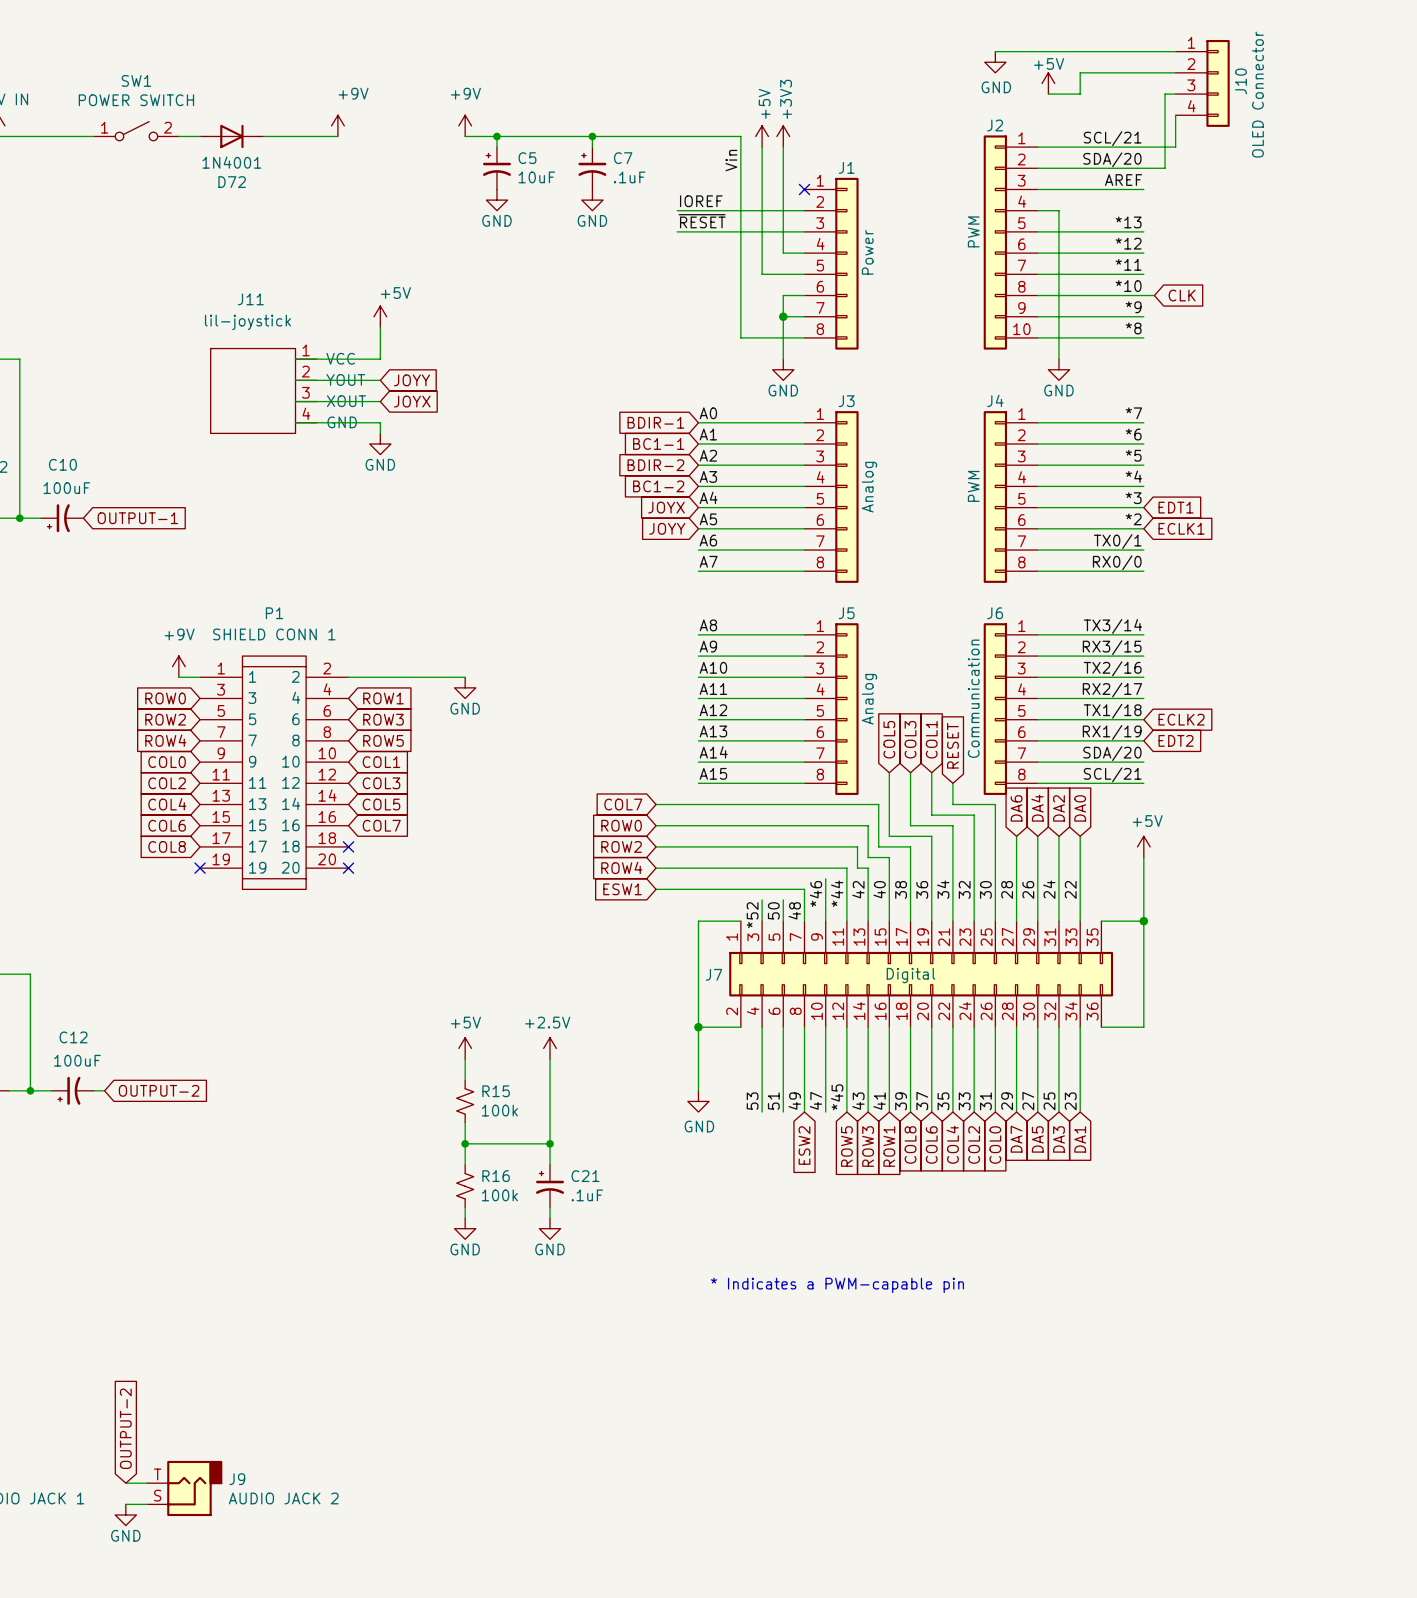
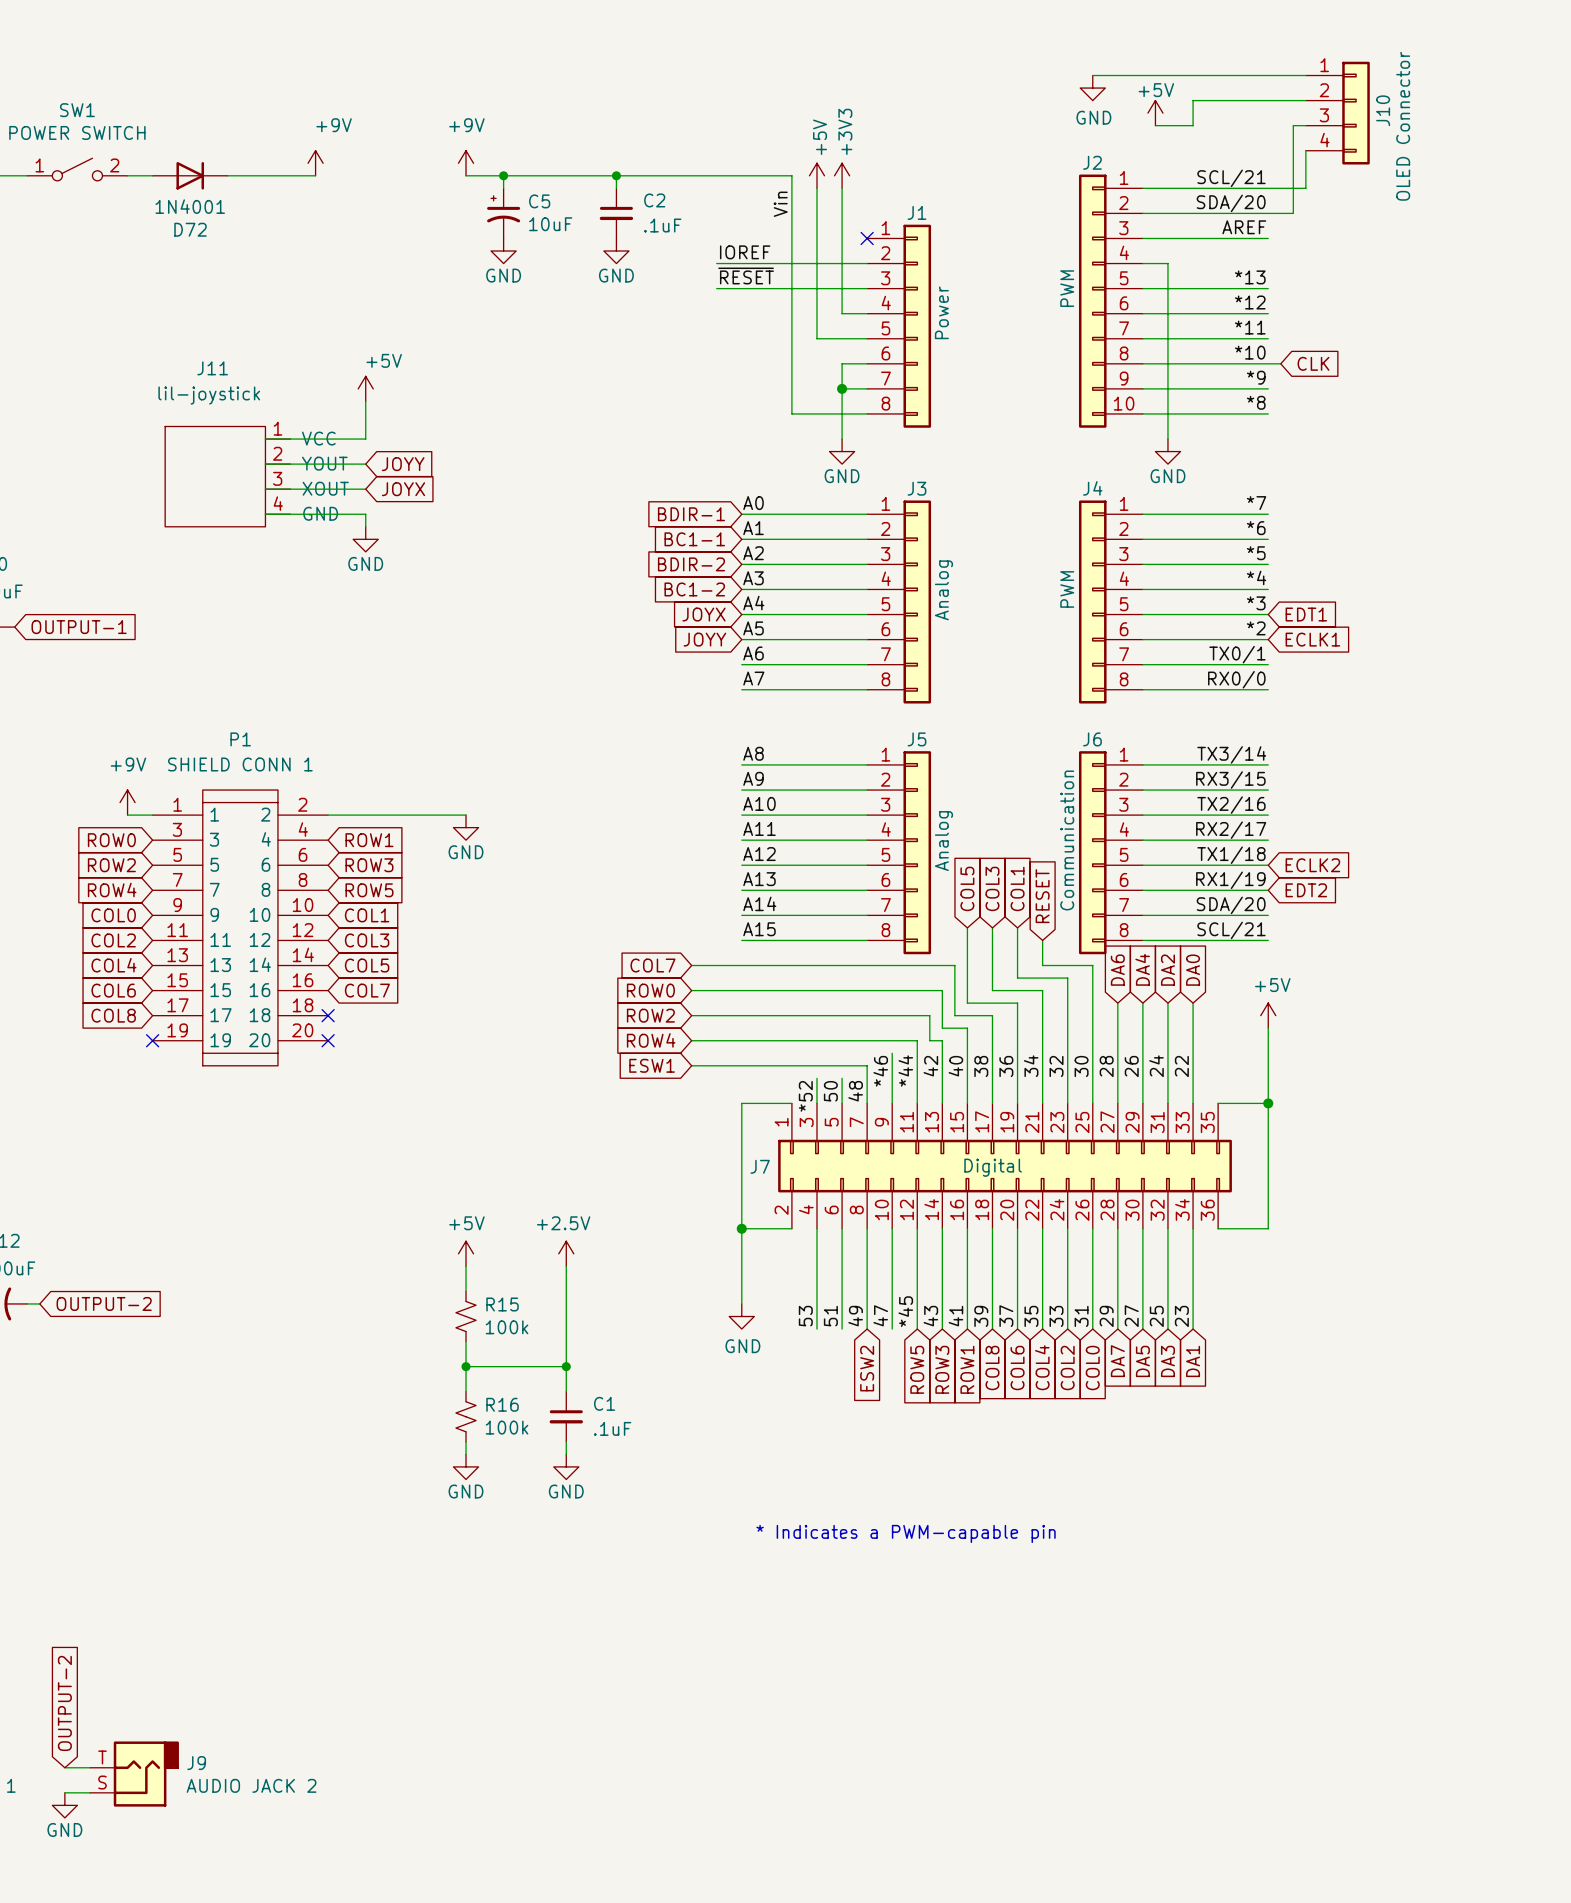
C7: .1uF (592, 168) -> none
C2: none -> .1uF (616, 213)
C21: .1uF (550, 1186) -> none
C1: none -> .1uF (566, 1416)

